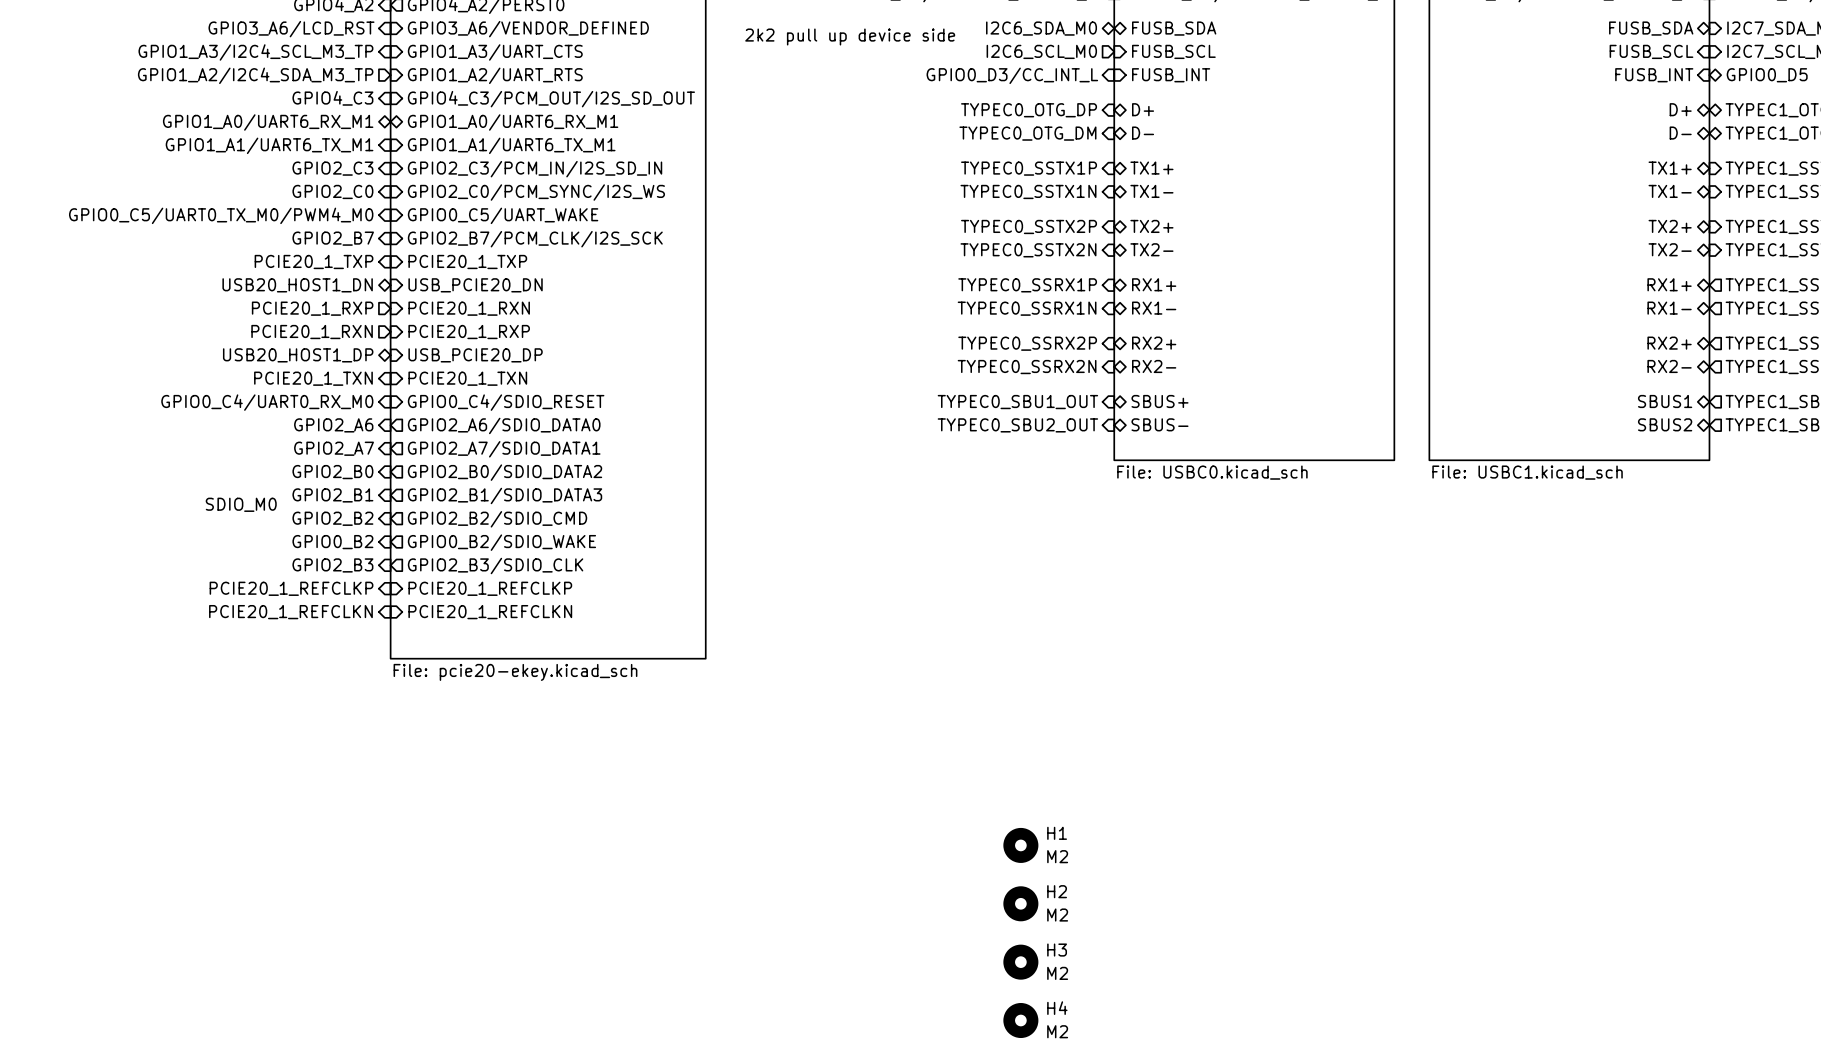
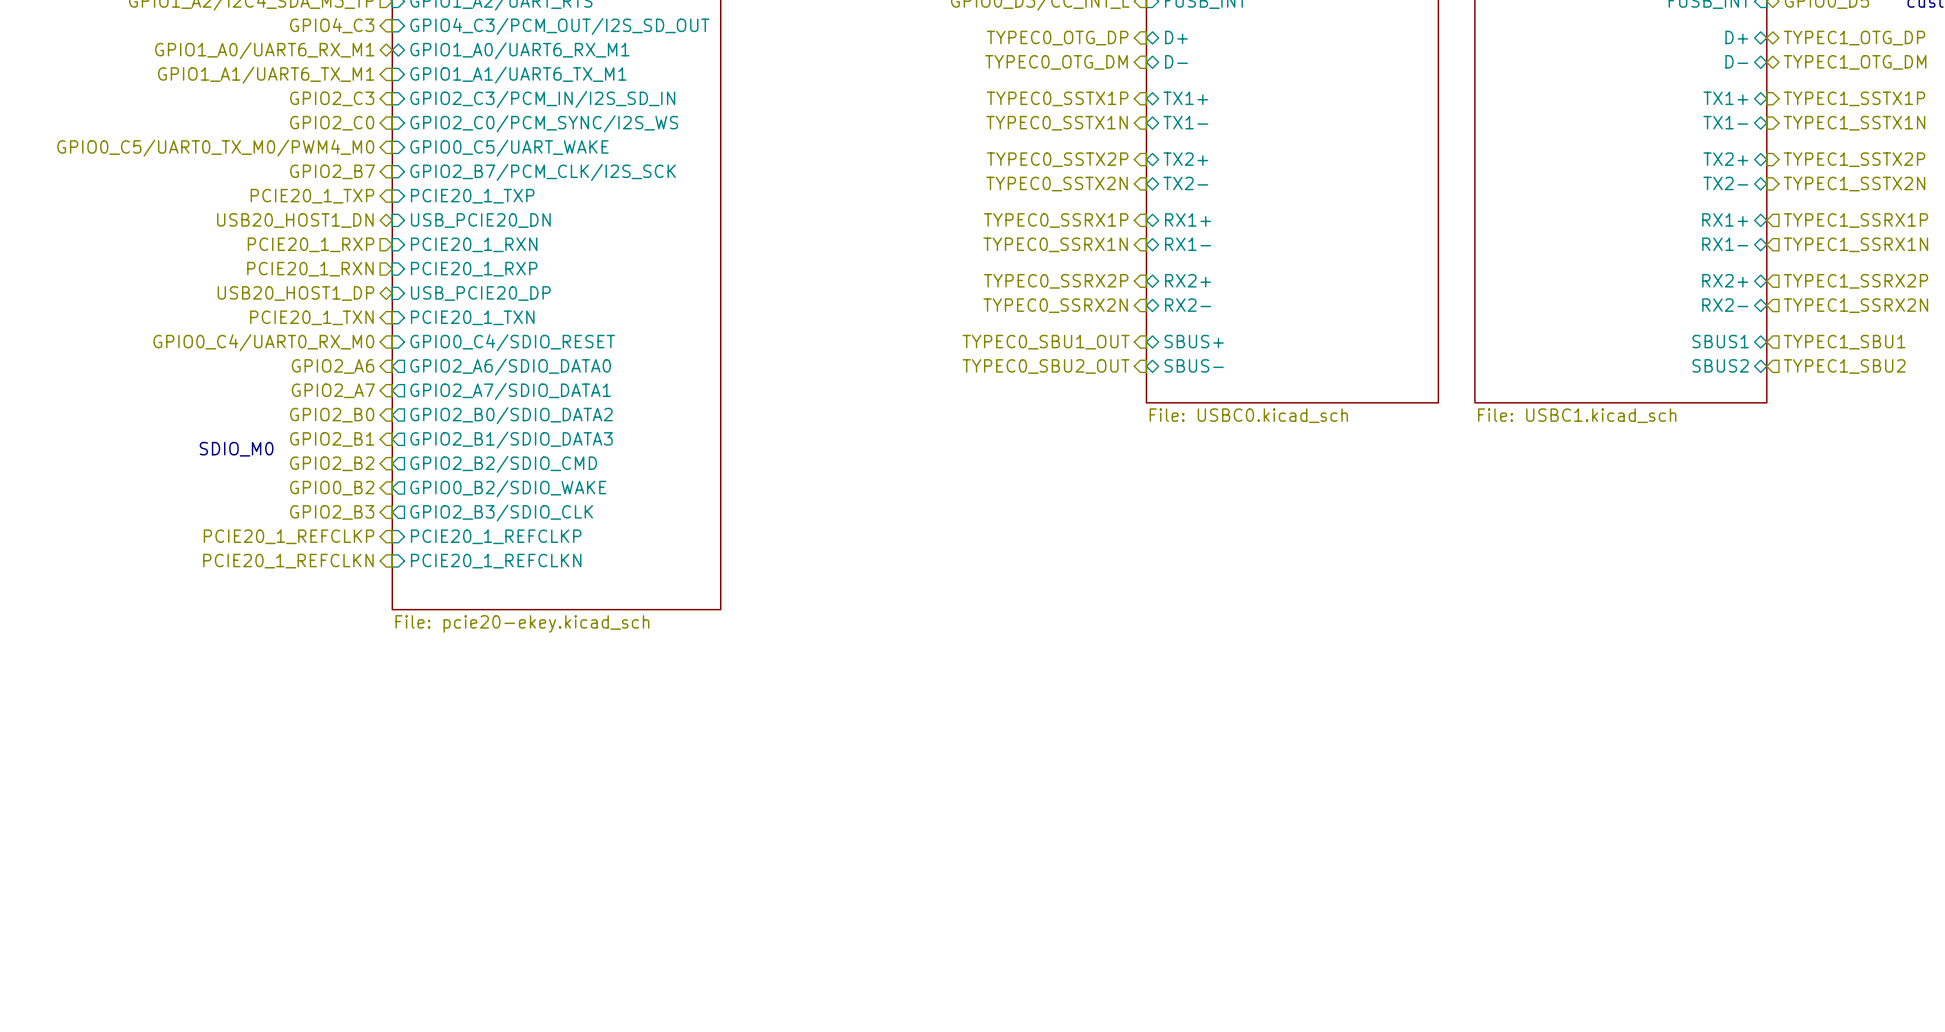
H1: M2 (1020, 845) -> none
H2: M2 (1020, 903) -> none
H3: M2 (1020, 962) -> none
H4: M2 (1020, 1020) -> none

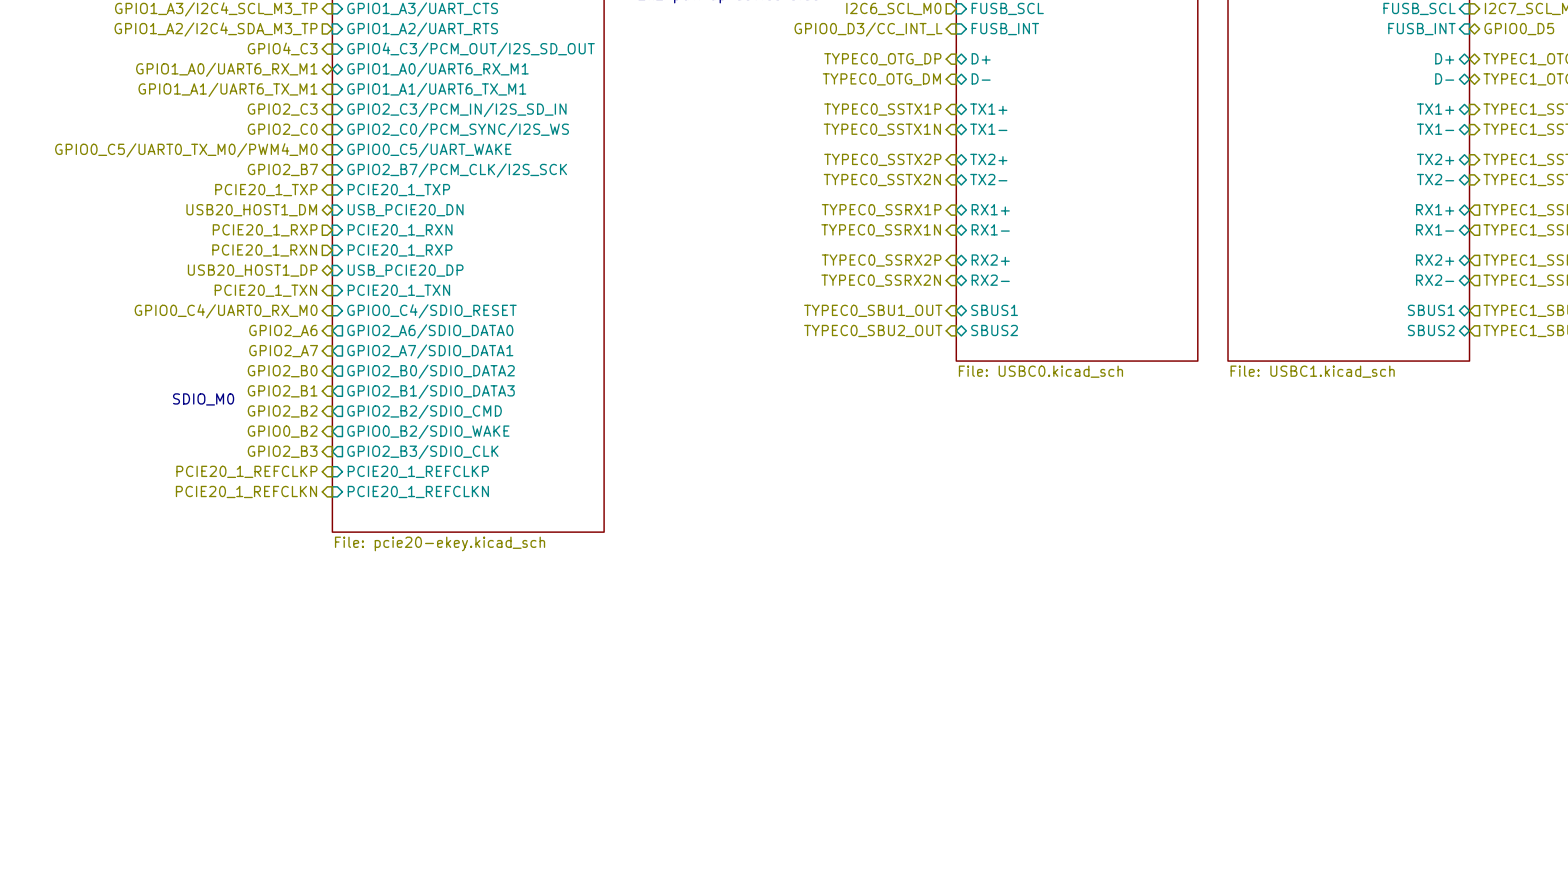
hierarchical label: USB20_HOST1_DN (295, 220) -> USB20_HOST1_DM (251, 210)
sheet pin: SBUS+ (1194, 341) -> SBUS1 (994, 310)
sheet pin: SBUS- (1194, 365) -> SBUS2 (994, 330)

